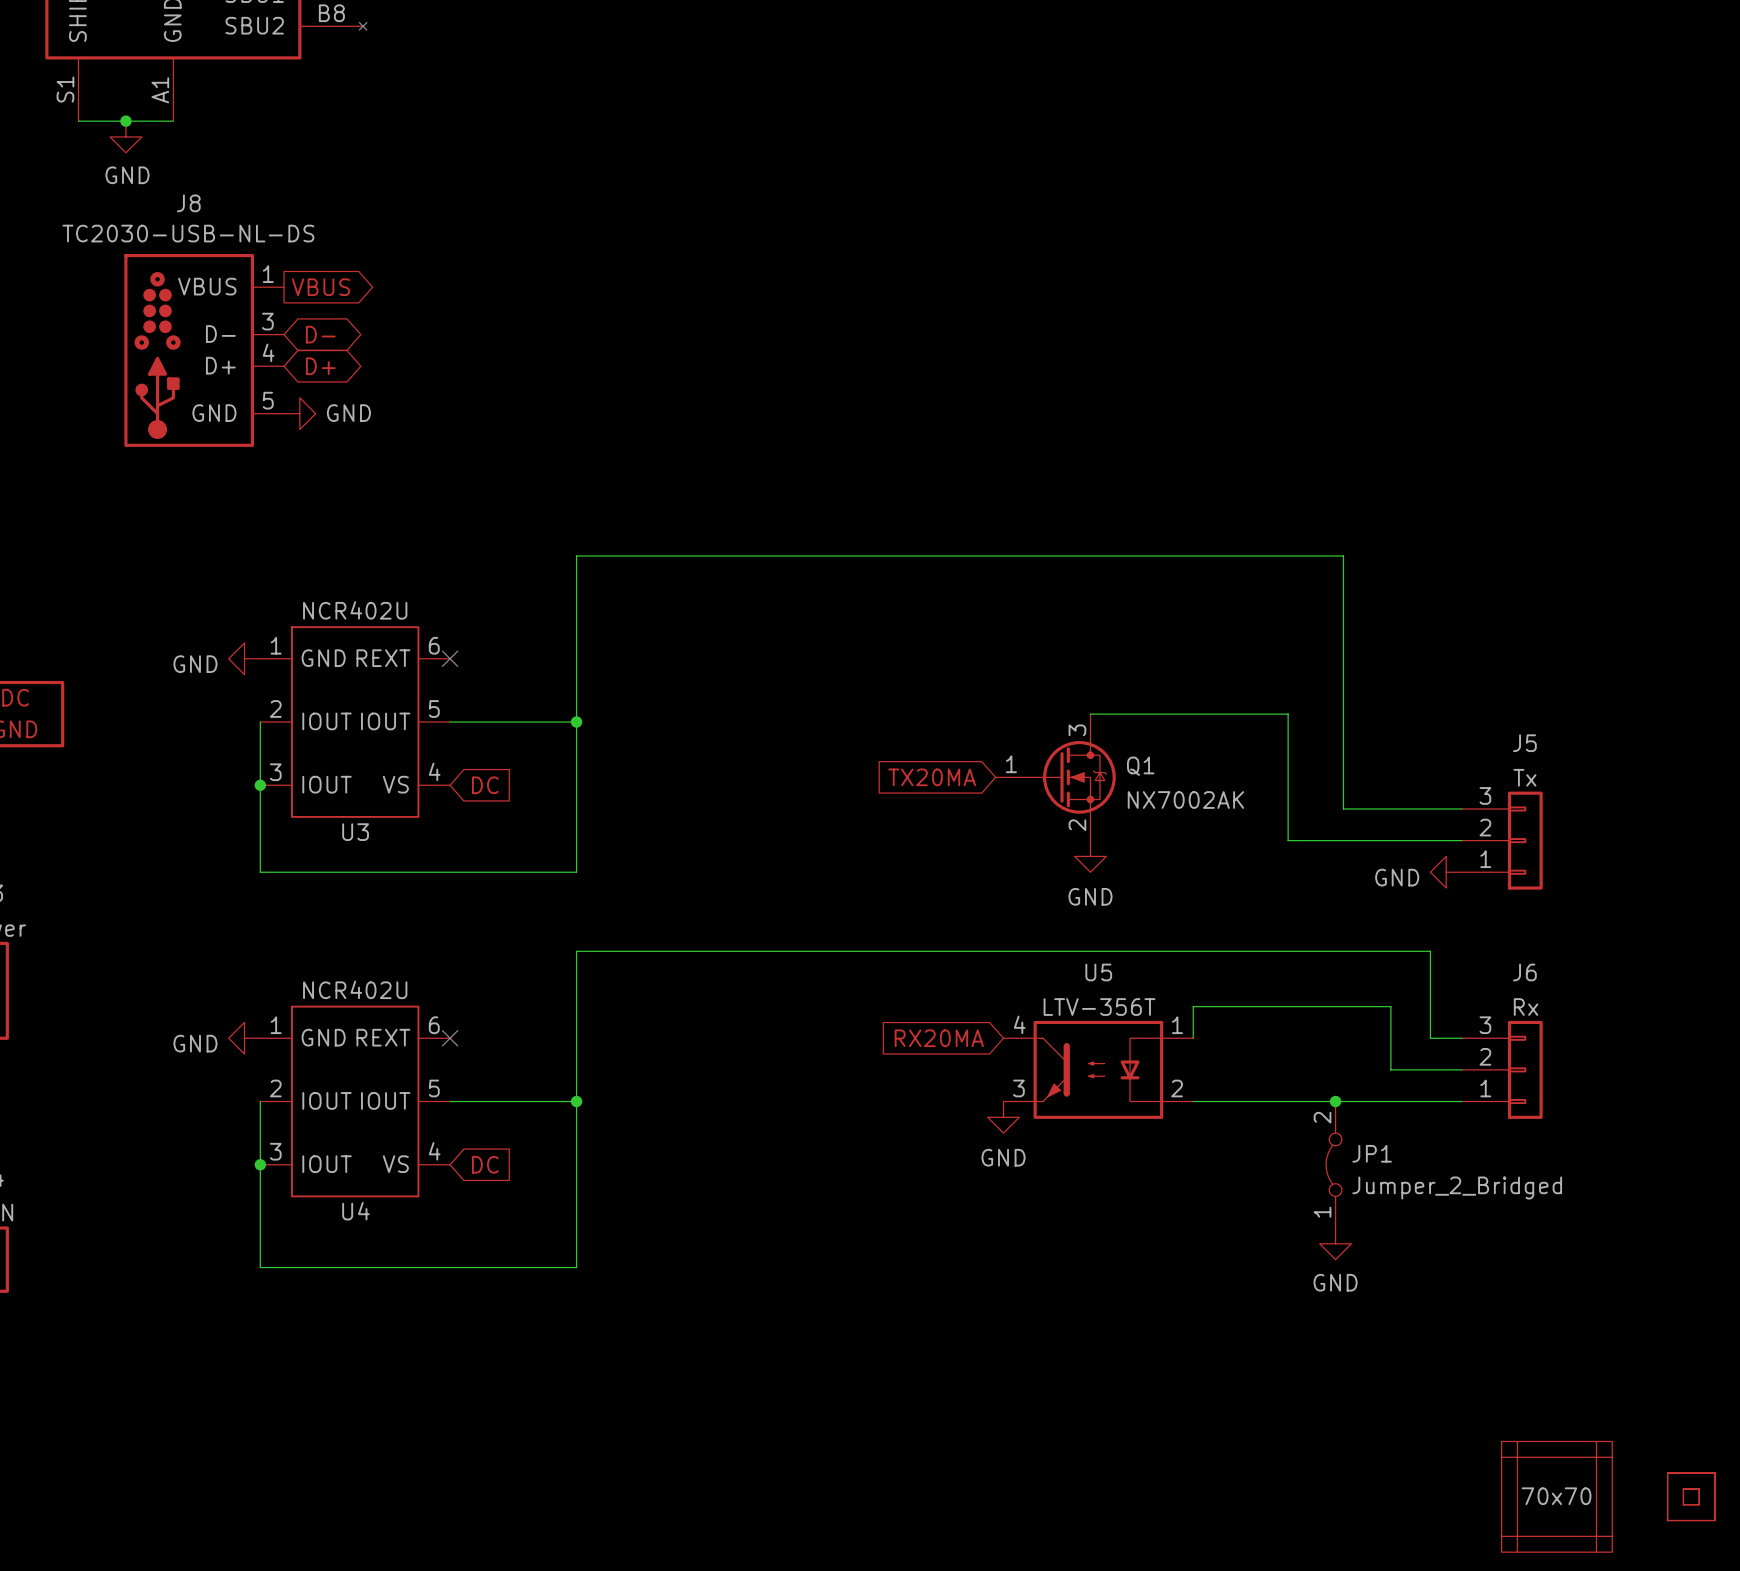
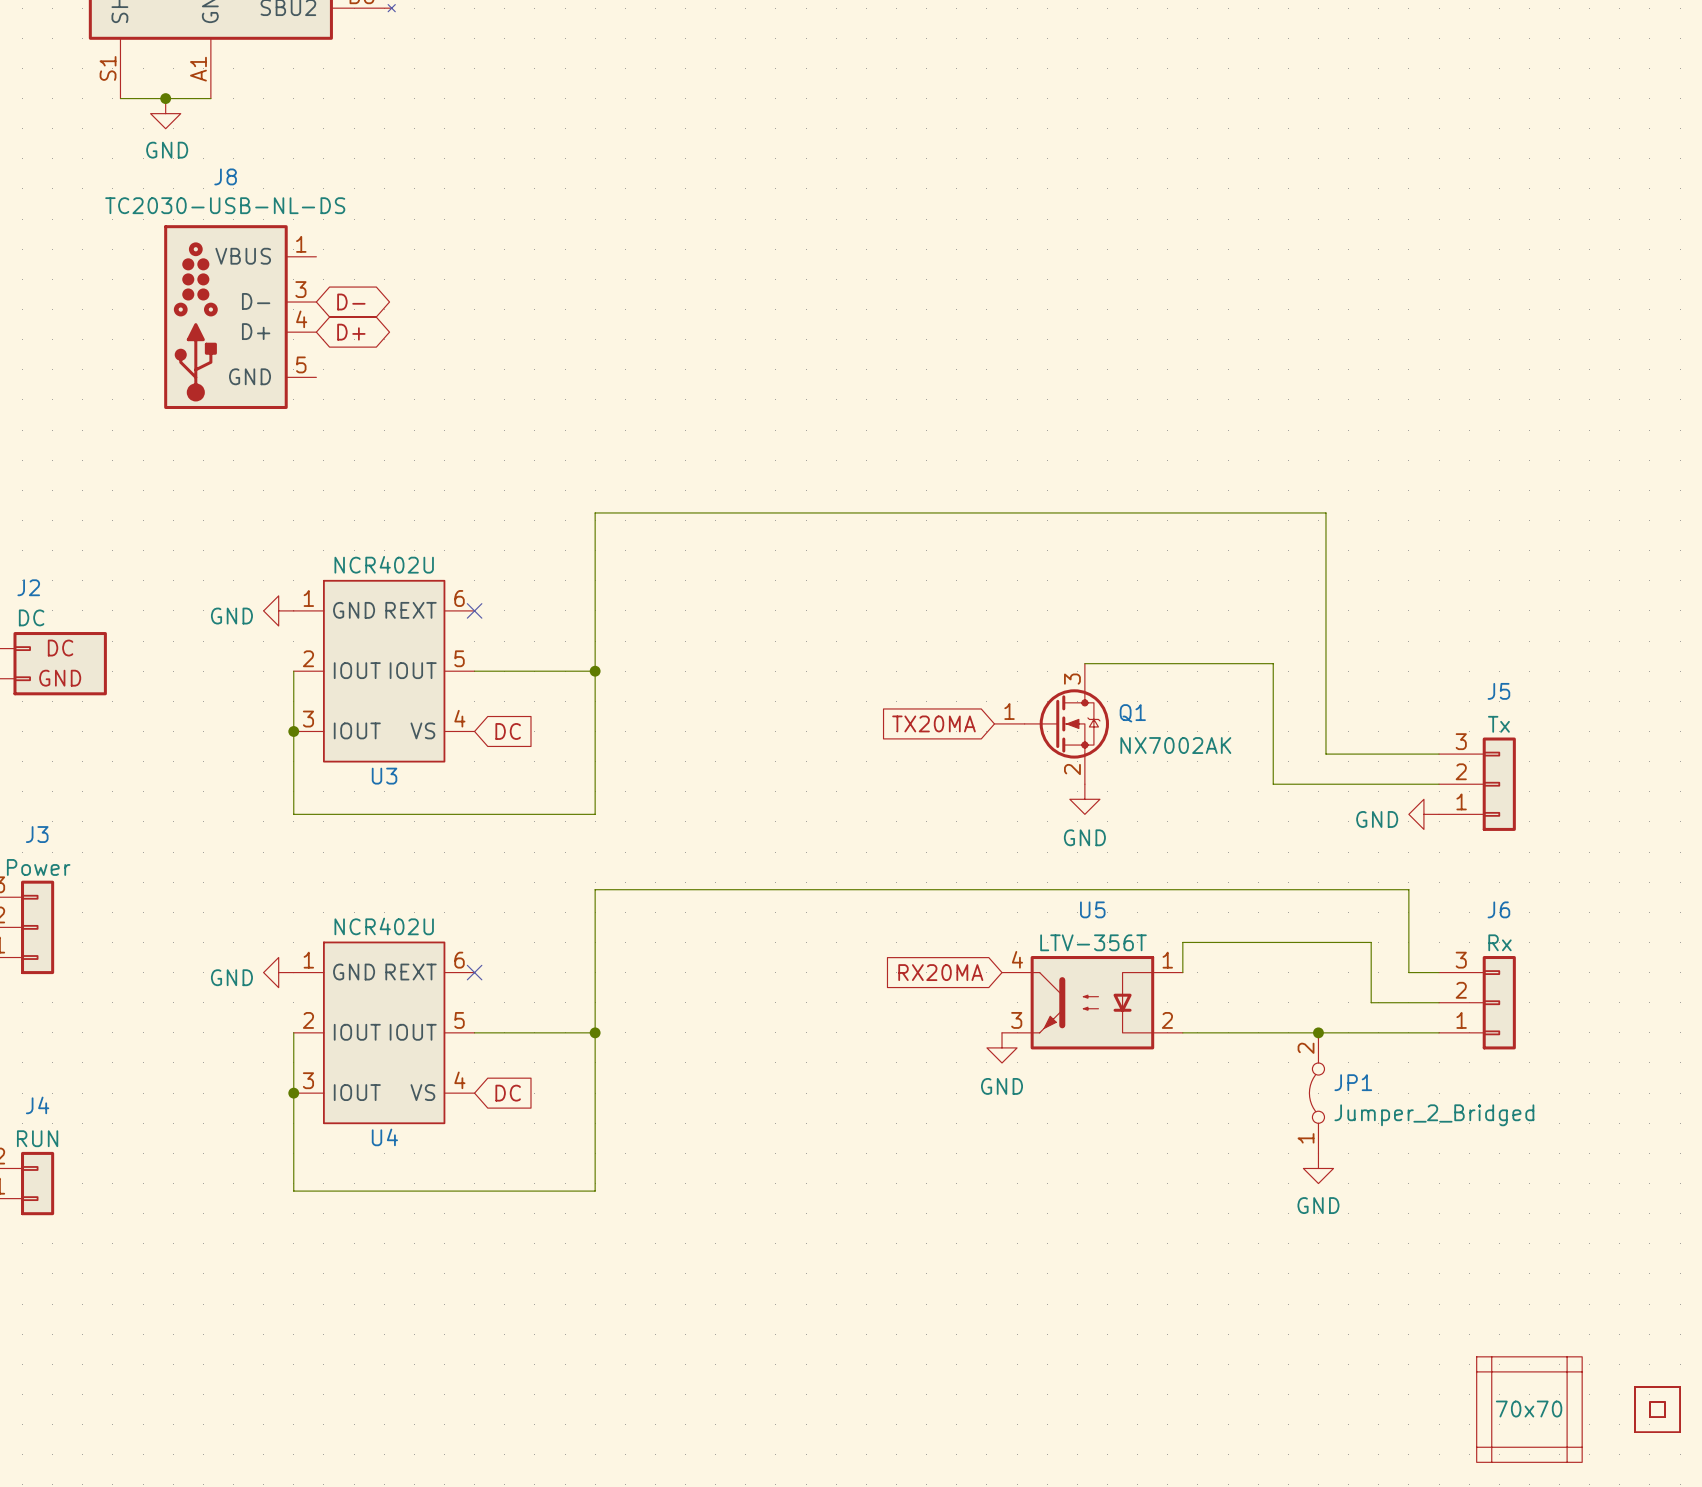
global label: VBUS (320, 287) -> none
power symbol: GND (299, 413) -> none

